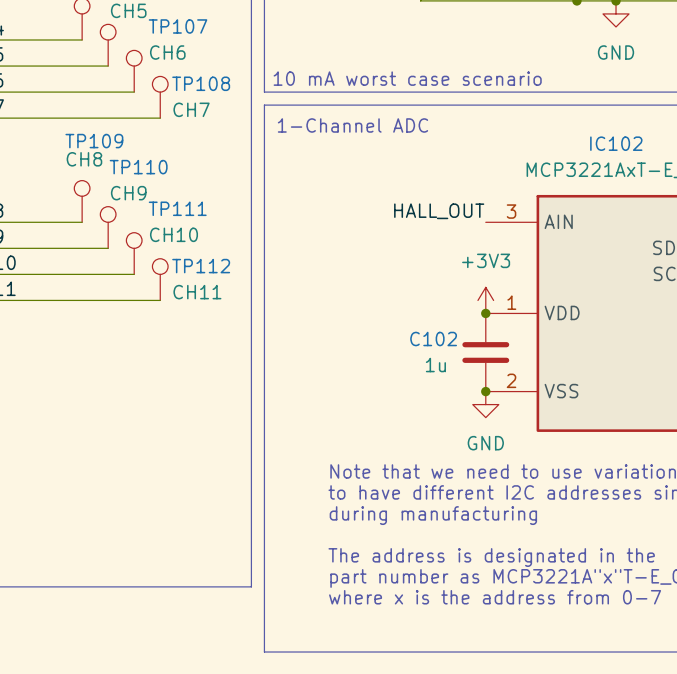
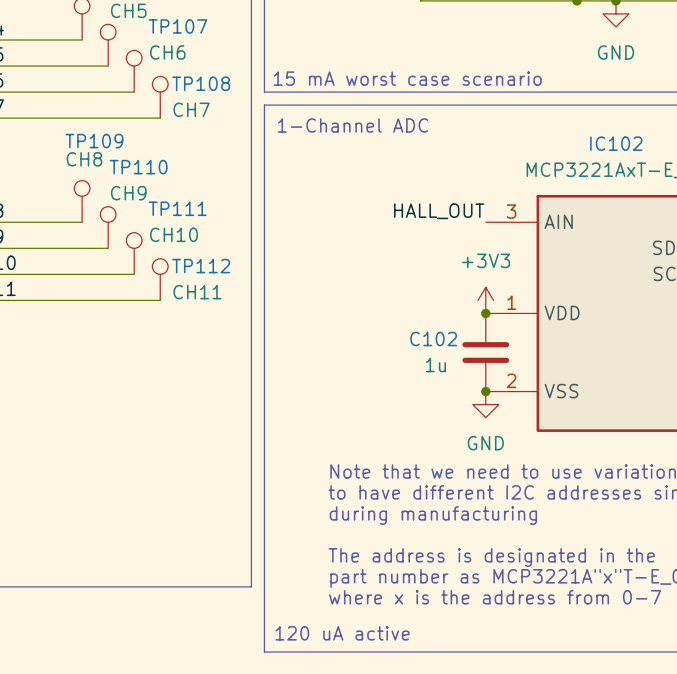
text: 10 mA worst case scenario (407, 78) -> 15 mA worst case scenario (407, 78)
text: none -> 120 uA active (342, 633)

